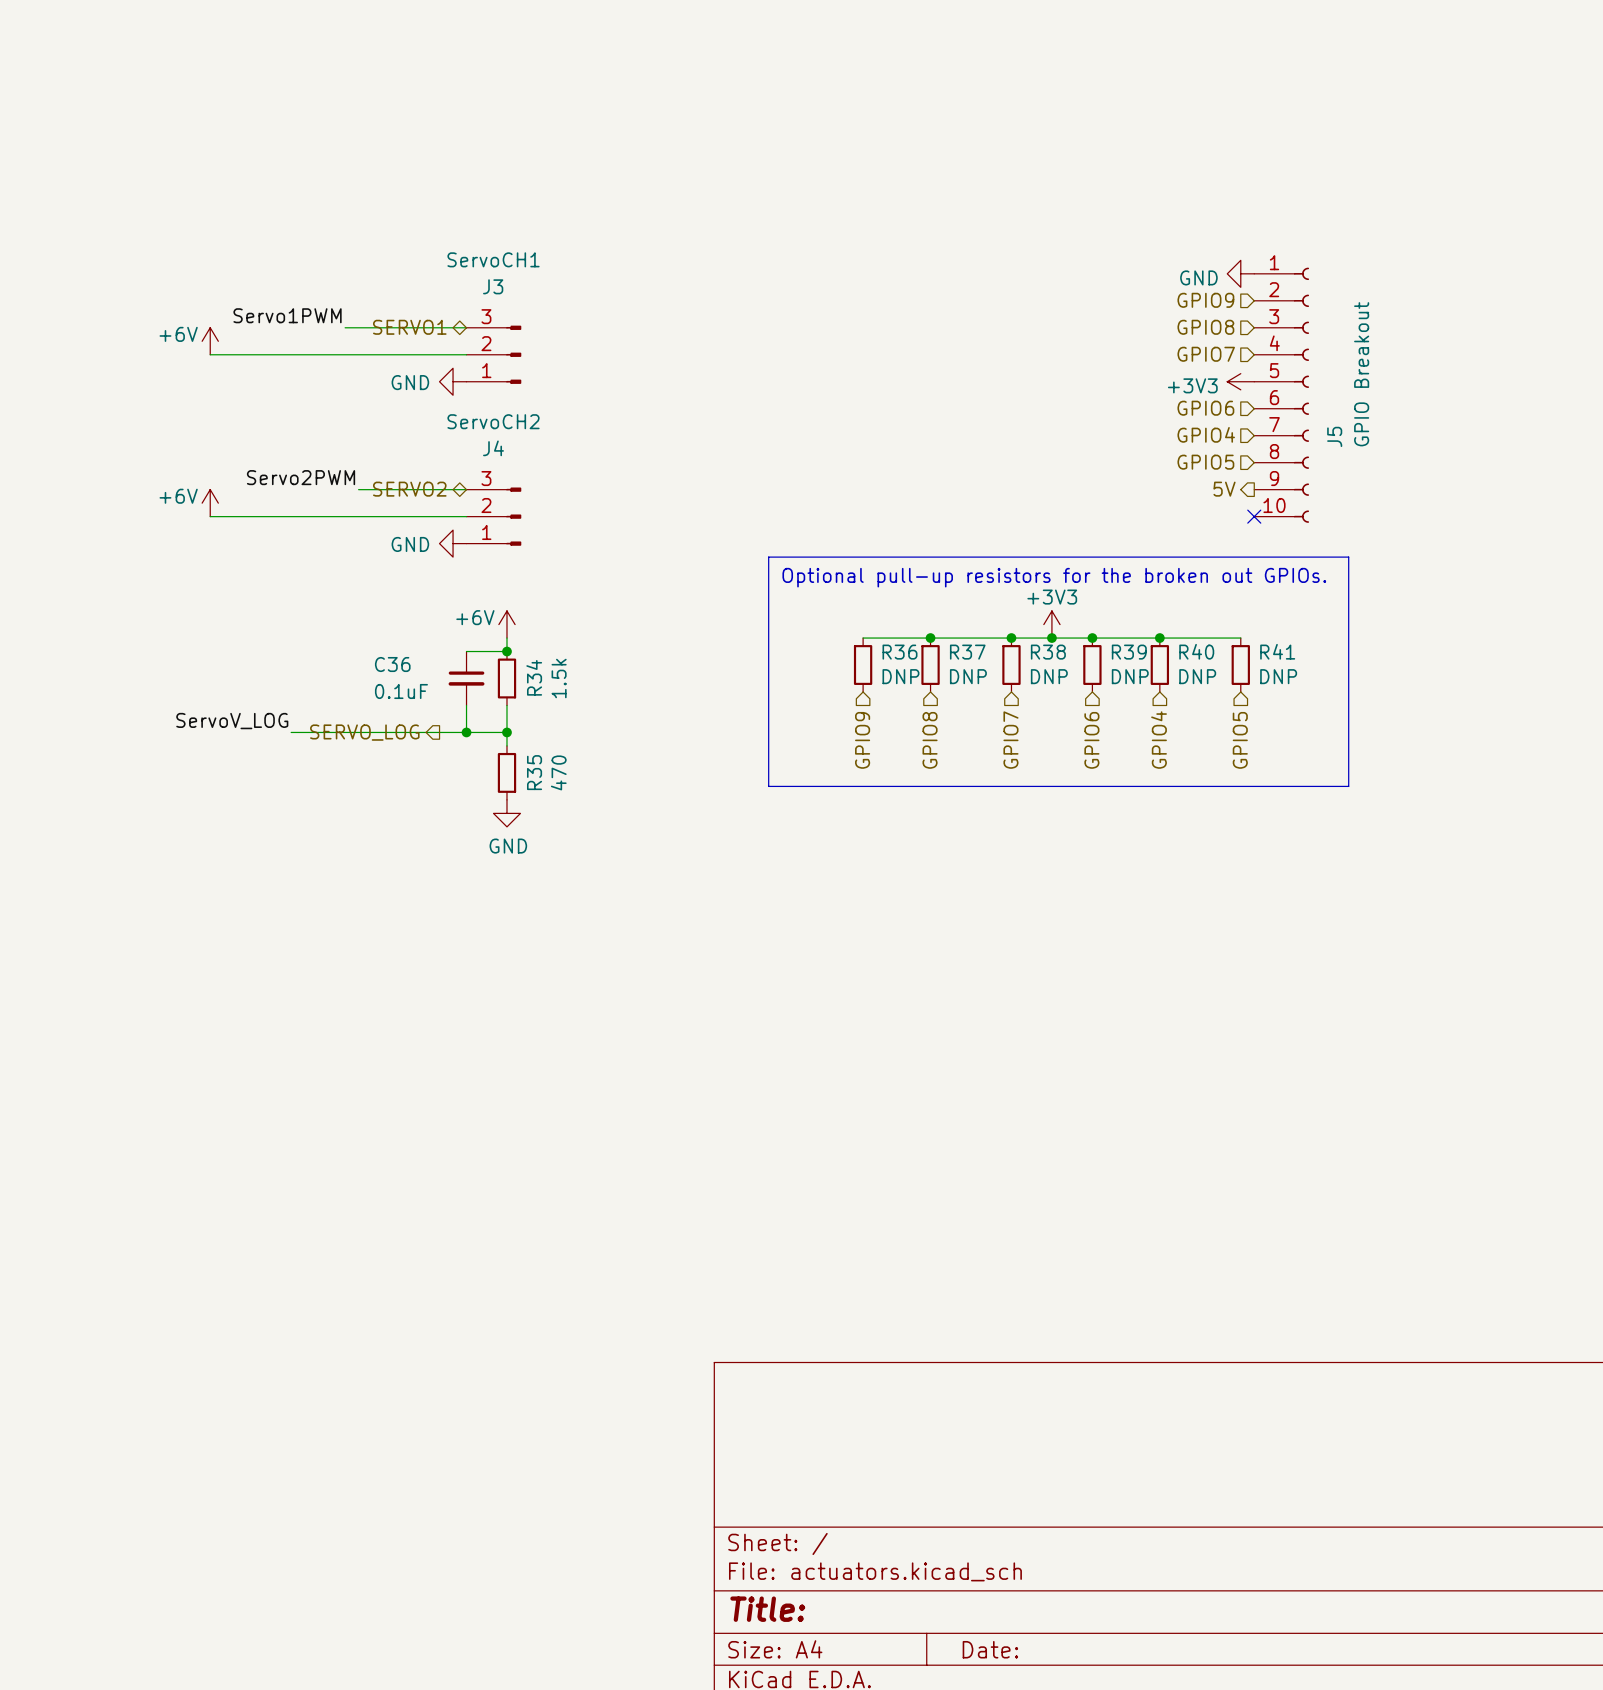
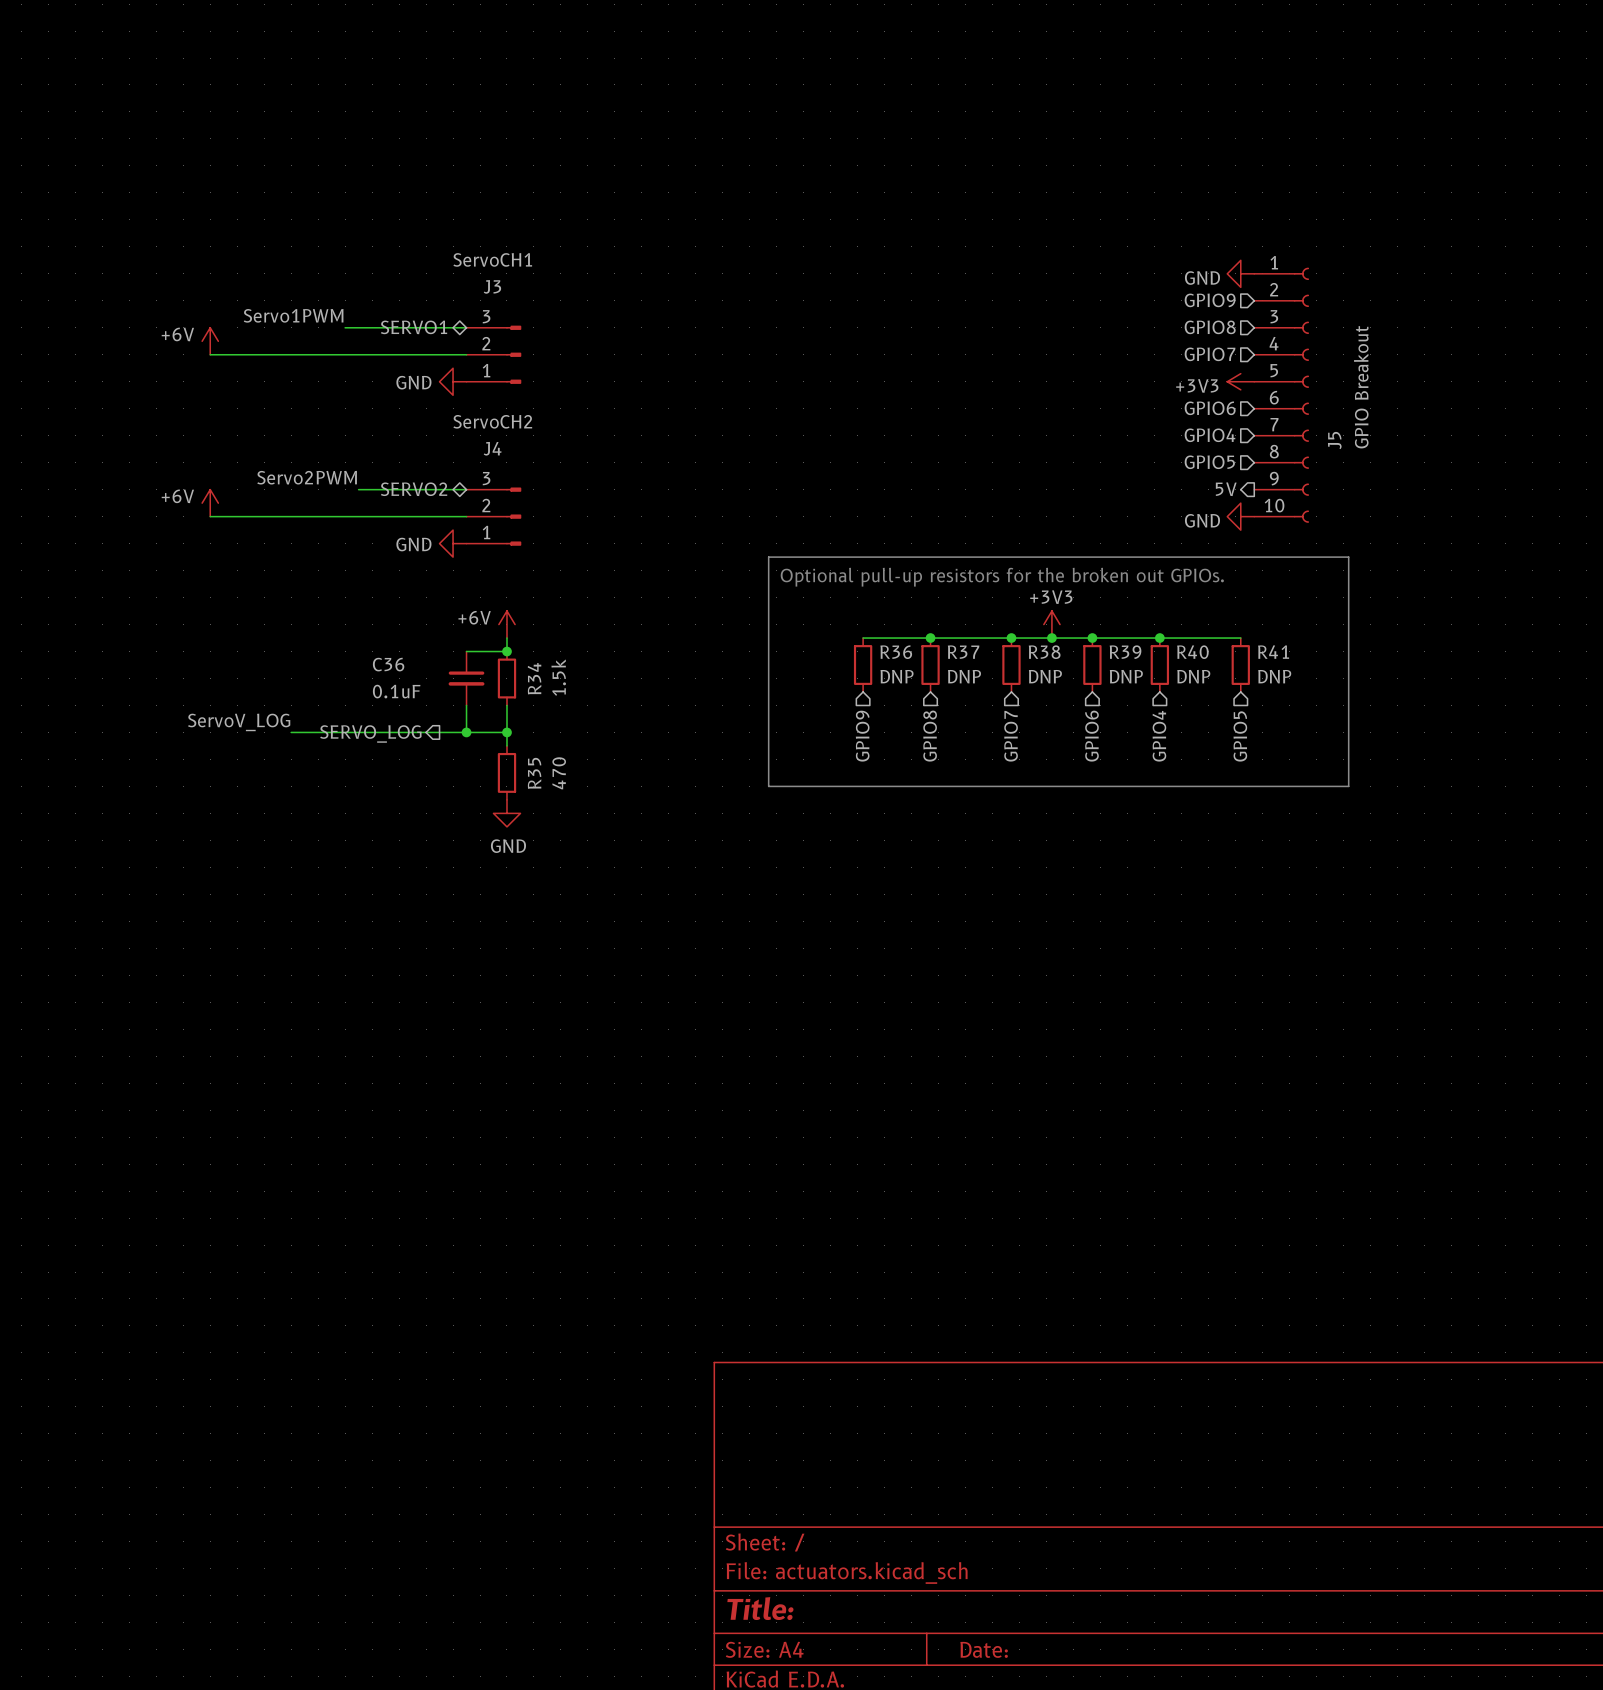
power symbol: none -> GND (1240, 516)
no-connect mark: (1254, 516) -> none

